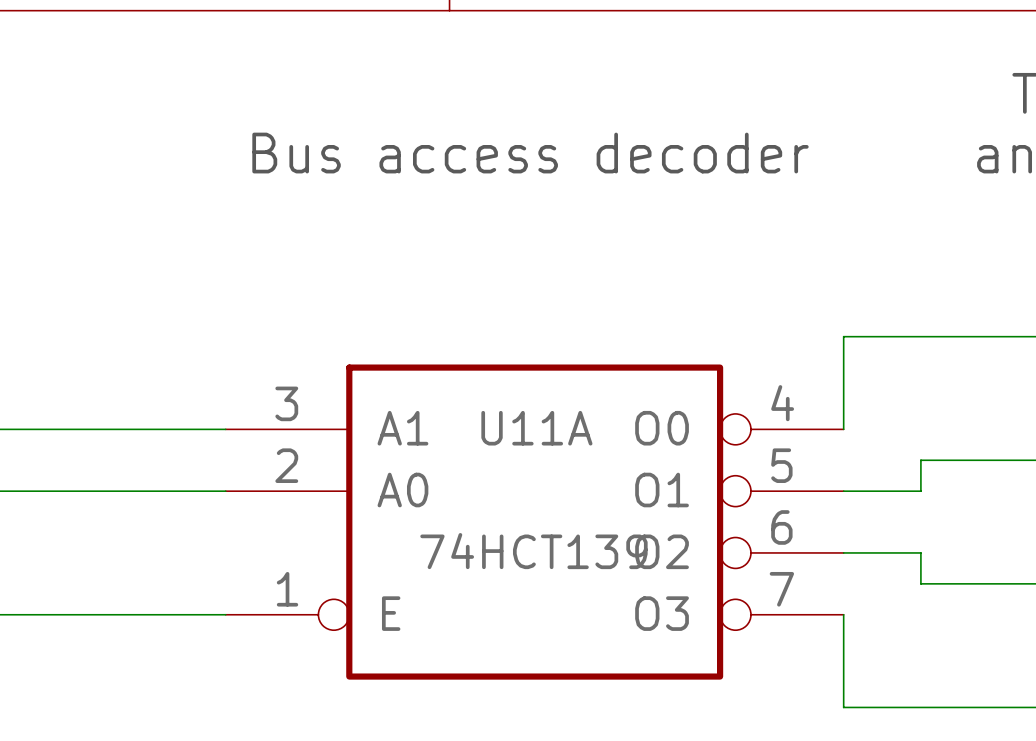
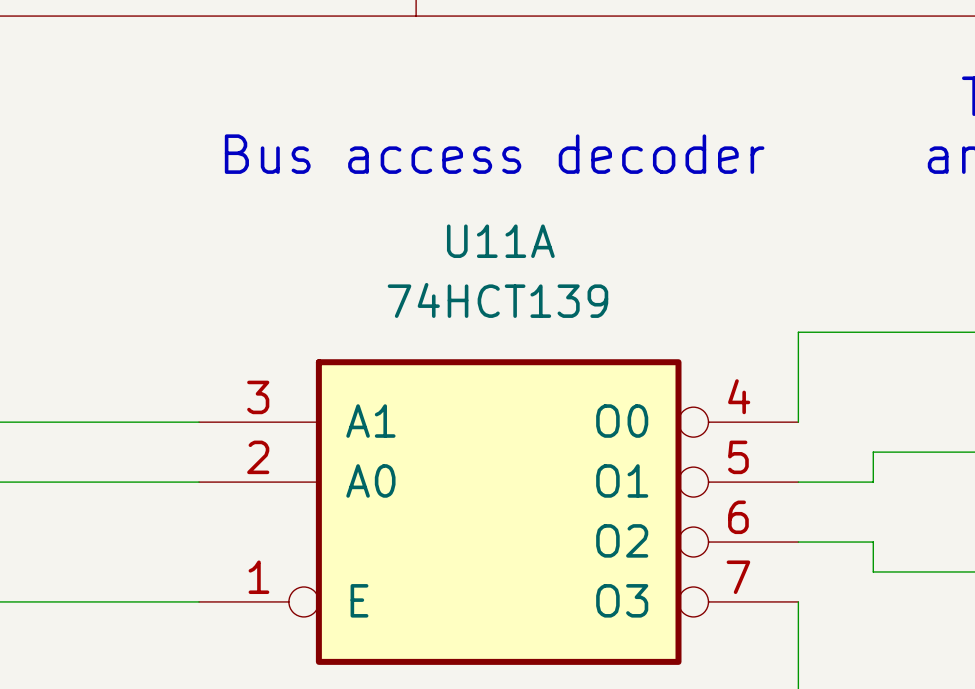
U11A name position: U11A (536, 428) -> U11A (500, 241)
U11A value position: 74HCT139 (533, 551) -> 74HCT139 (497, 300)

